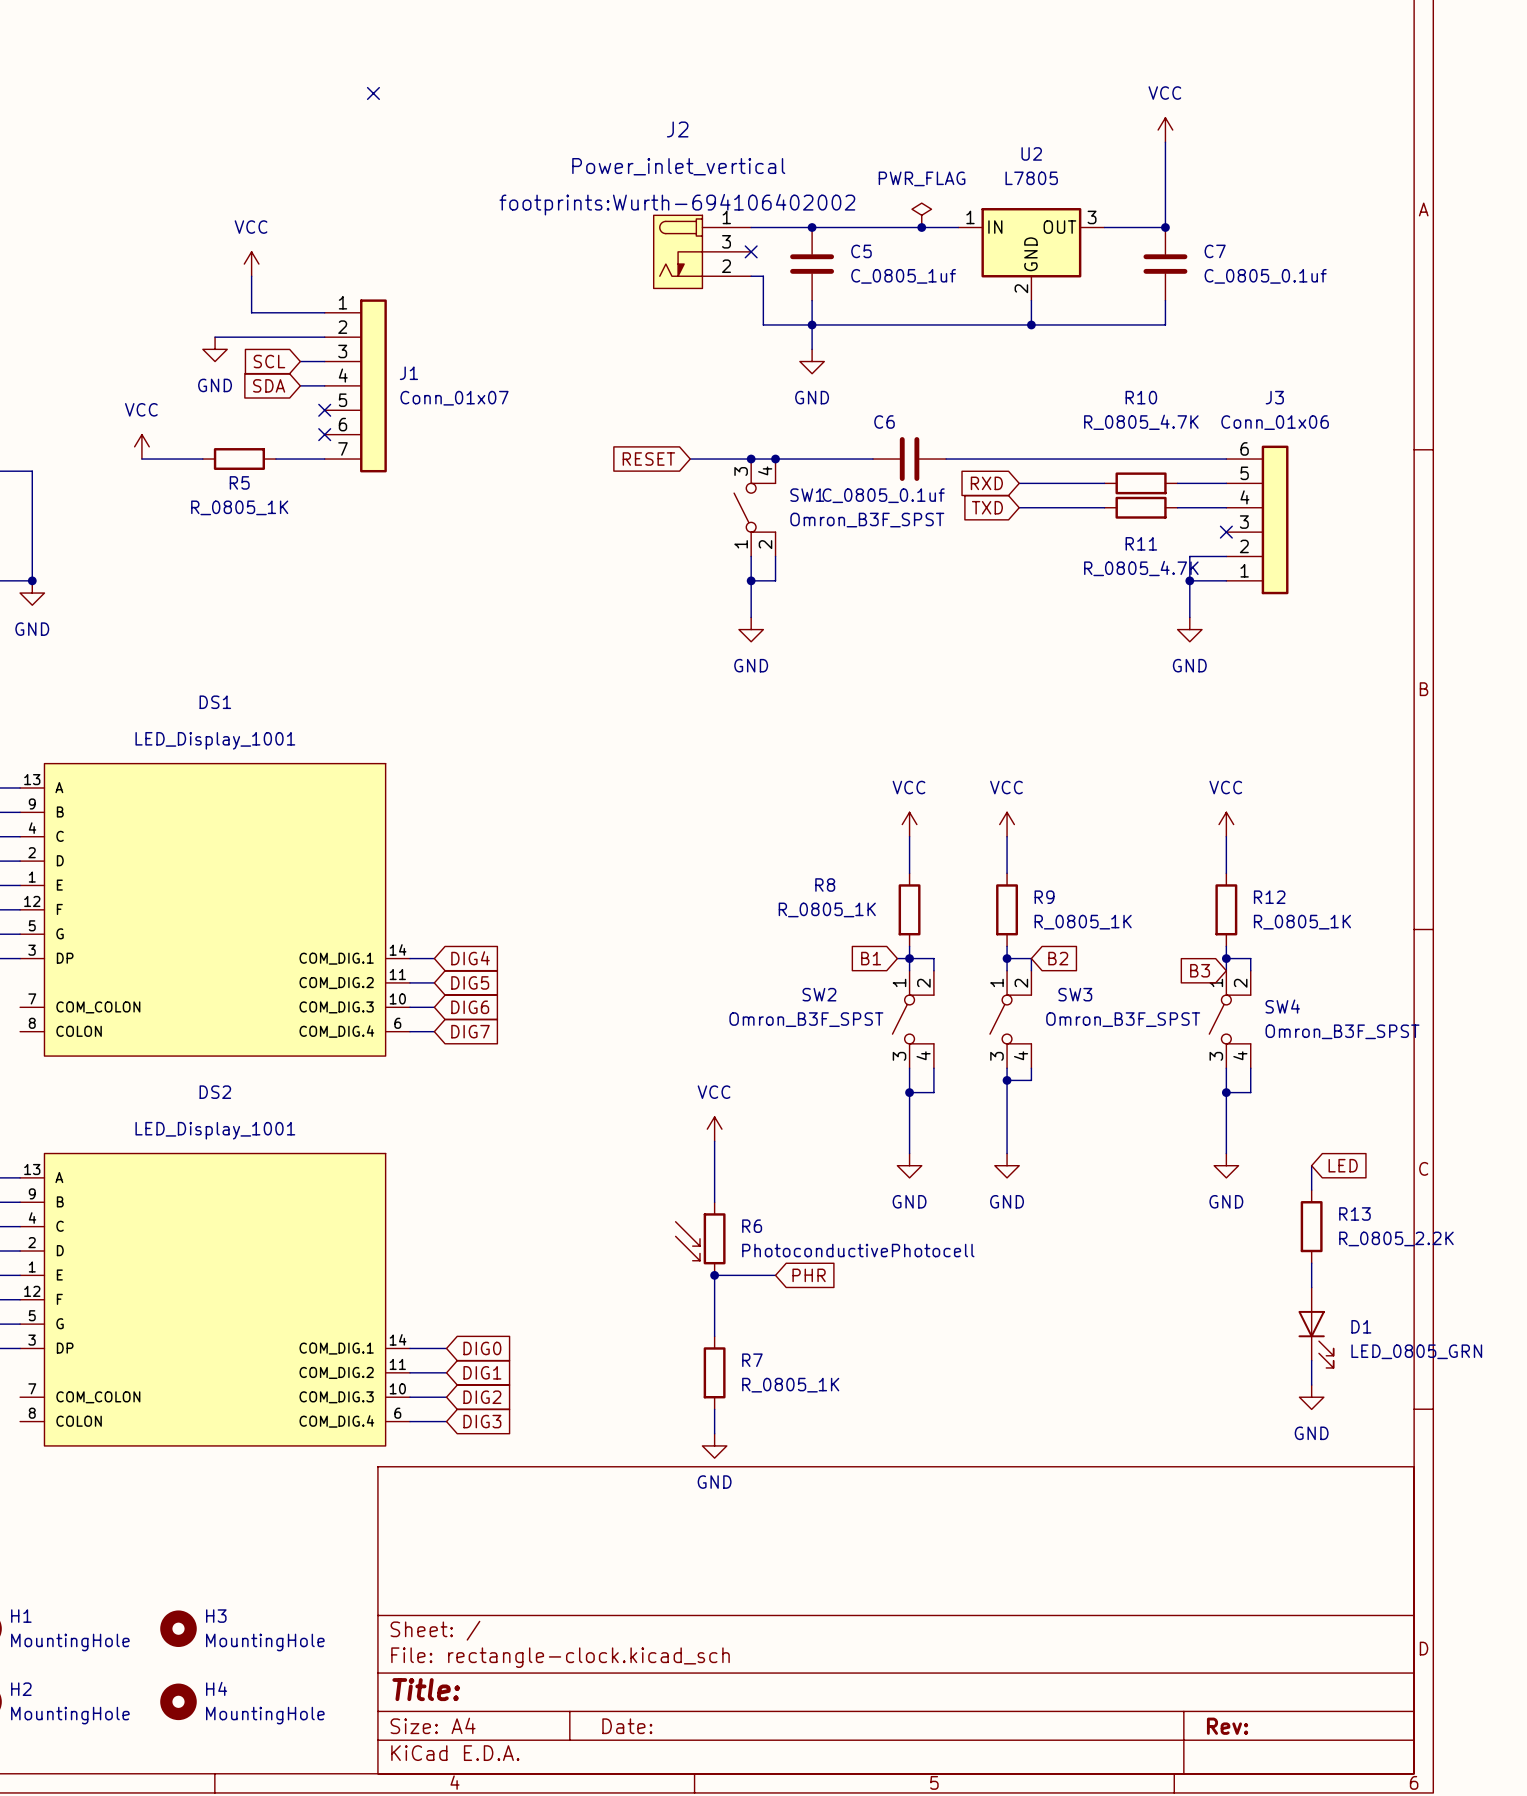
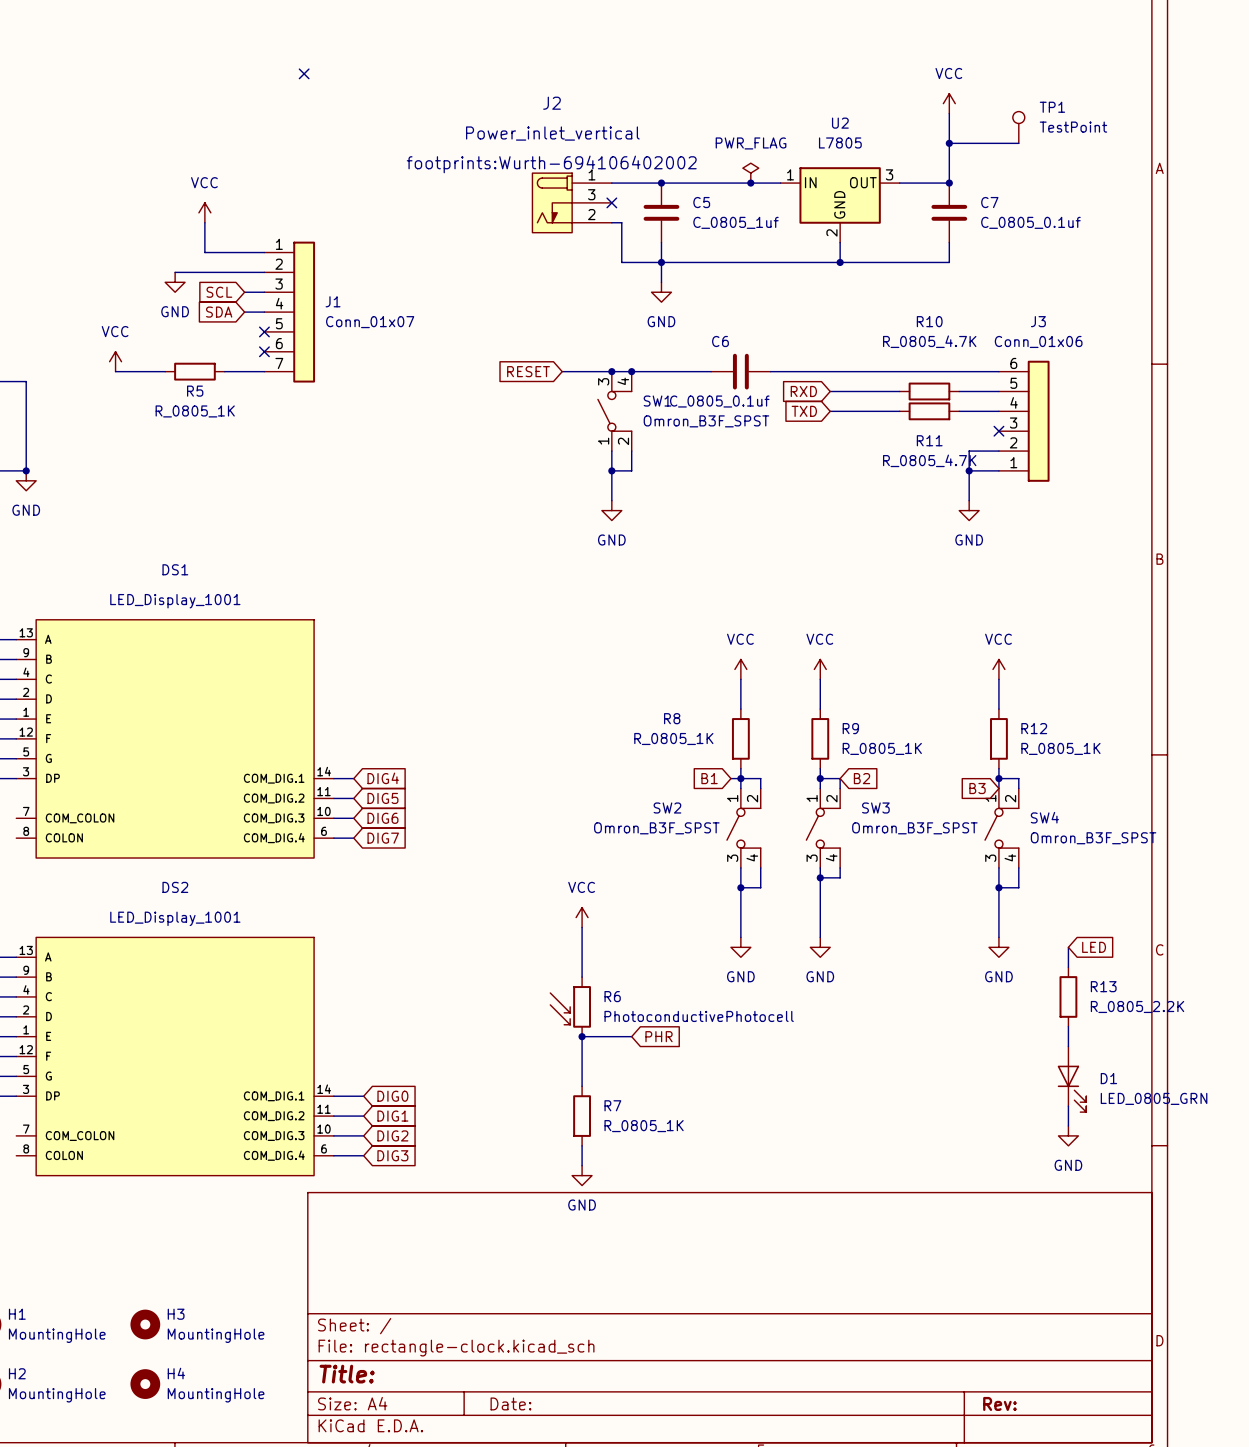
TP1: none -> TestPoint (1018, 127)
wire: none -> (949, 143) (1018, 143)
junction: none -> (949, 143)

